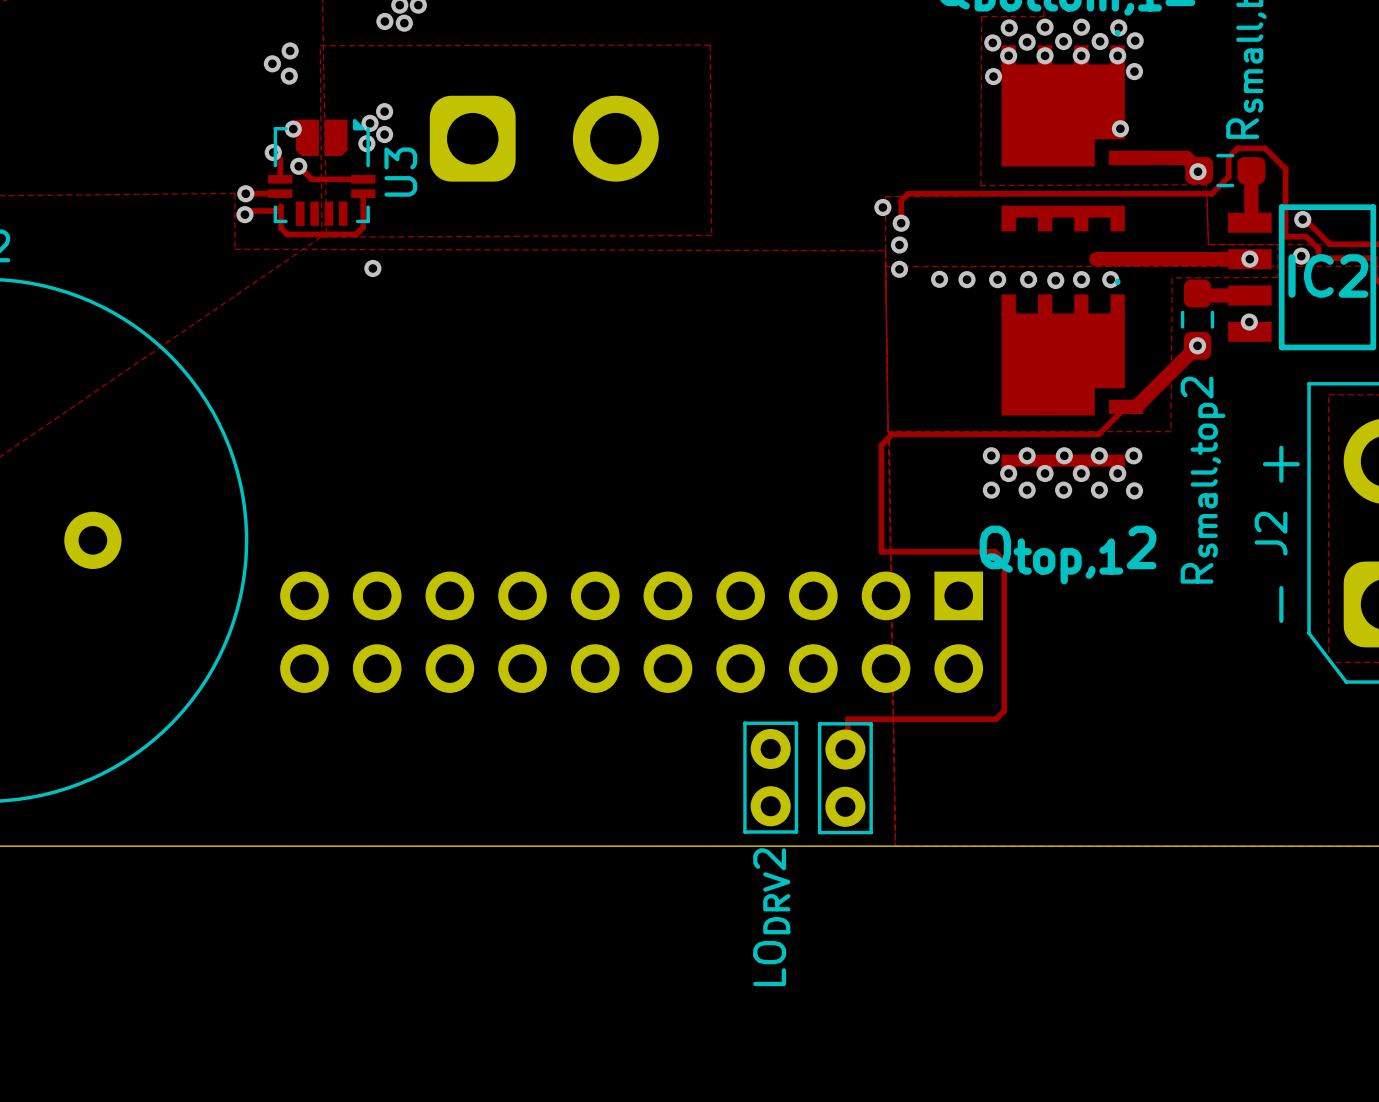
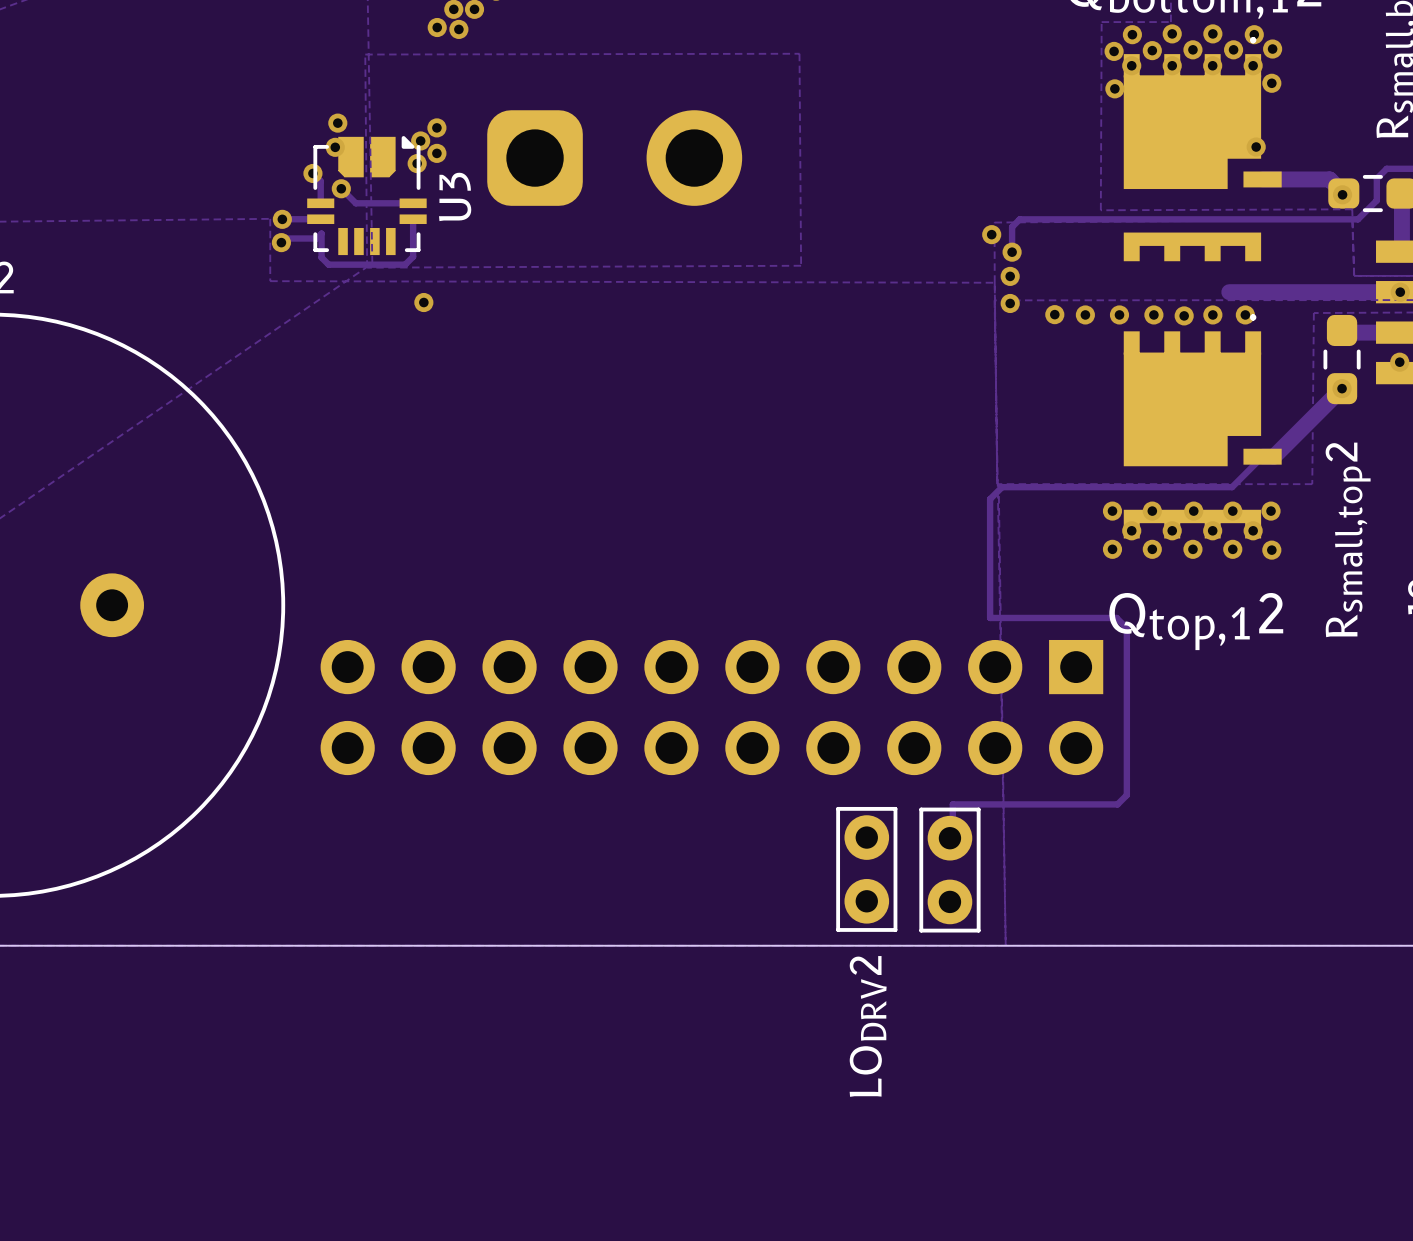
via: (290, 50) -> none
via: (272, 63) -> none
via: (289, 76) -> none
via: none -> (337, 123)

